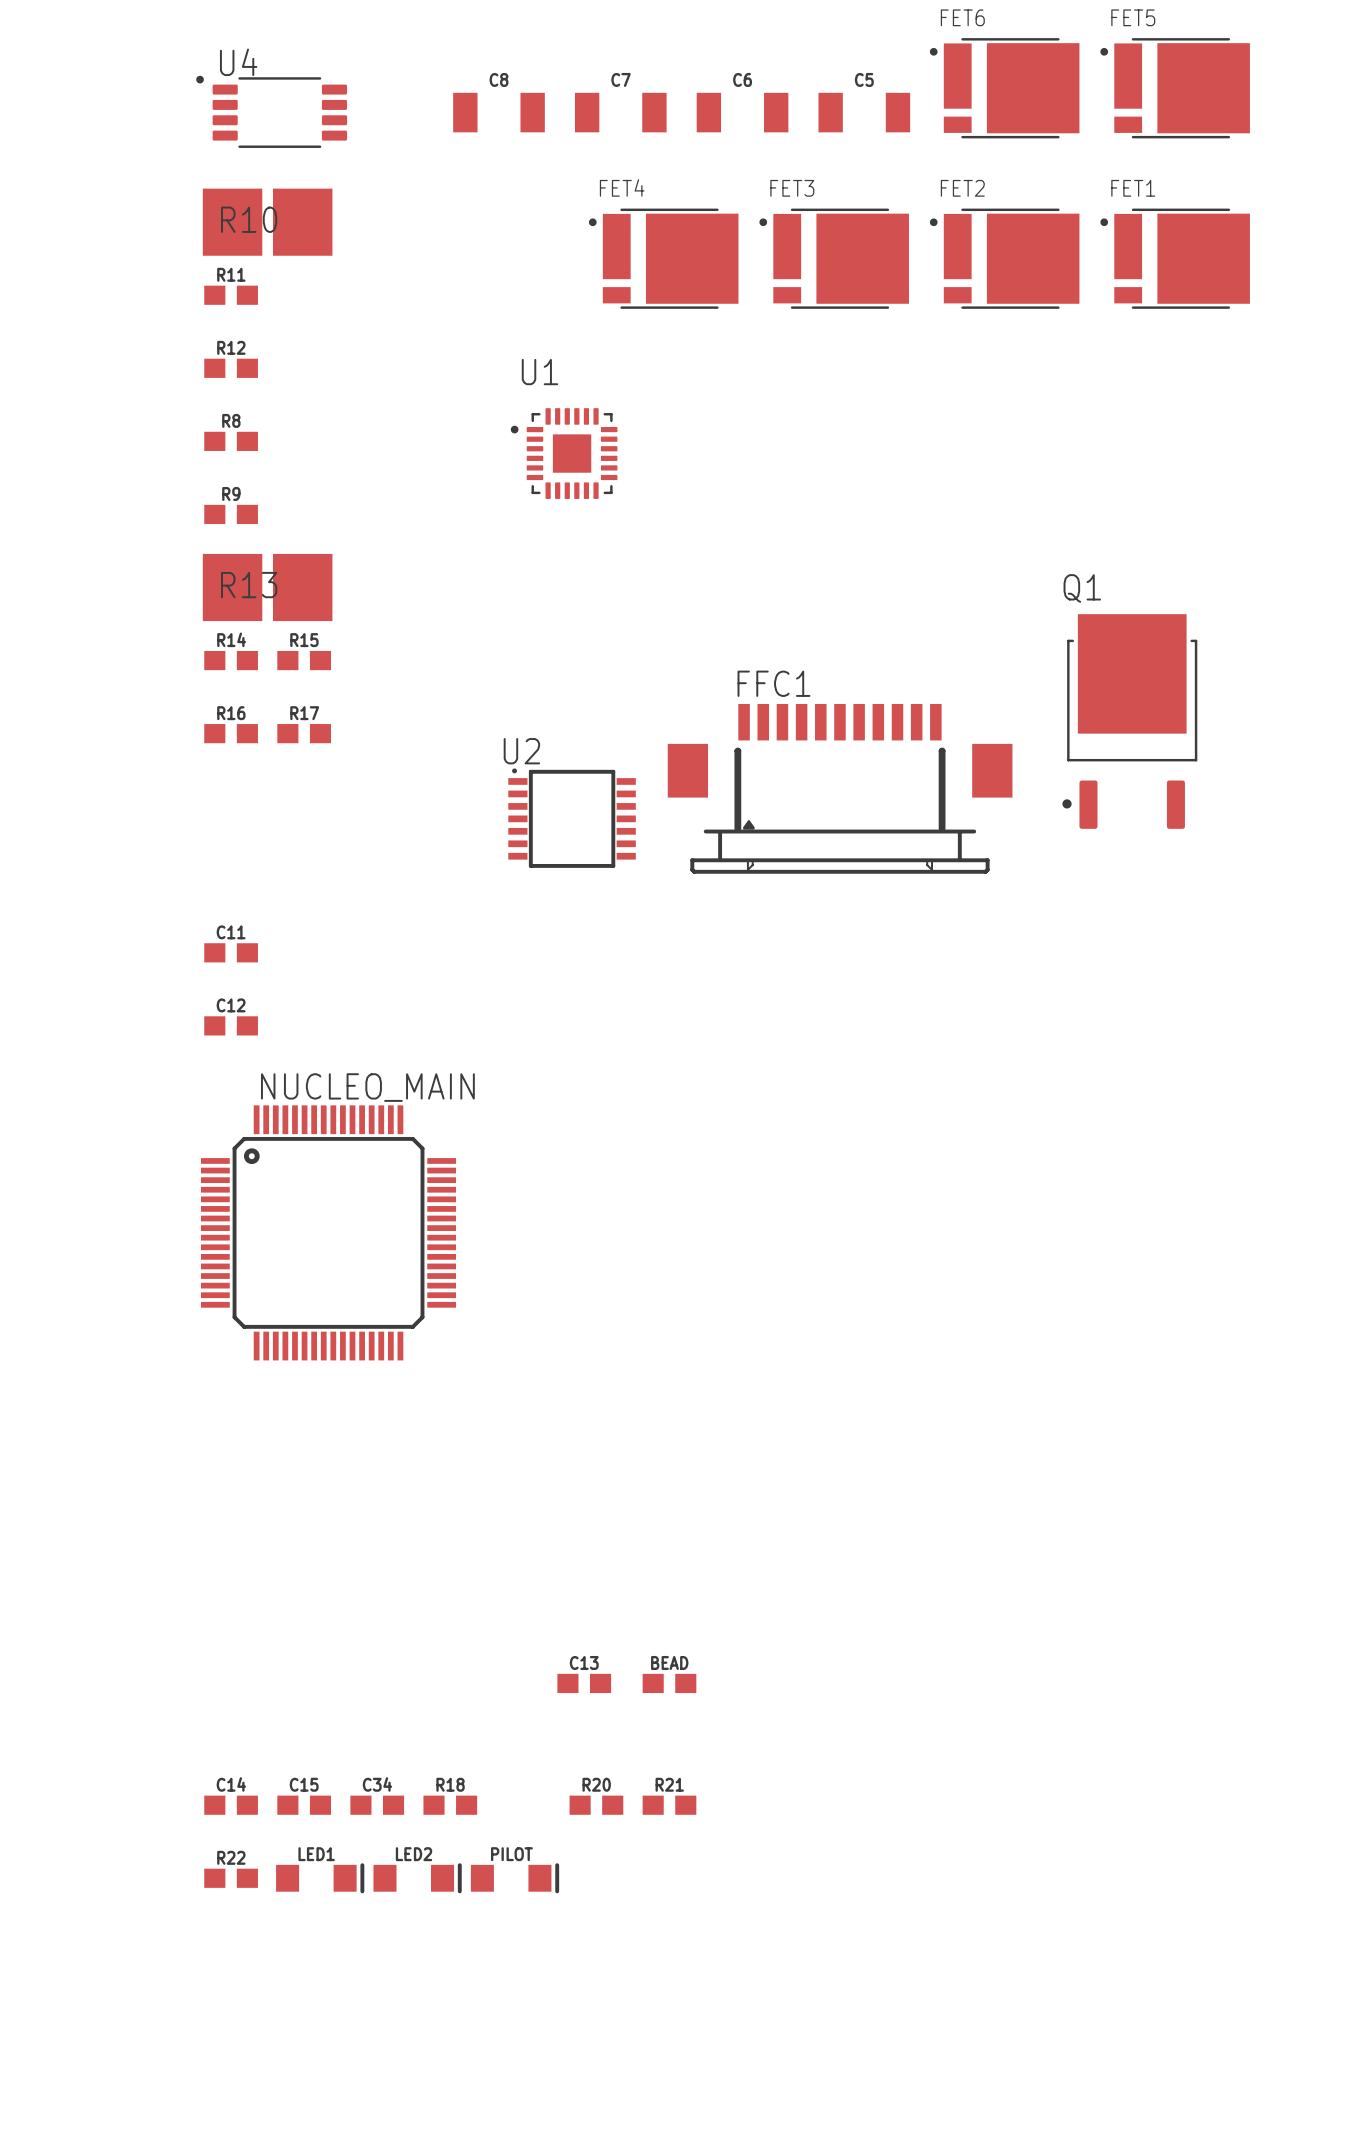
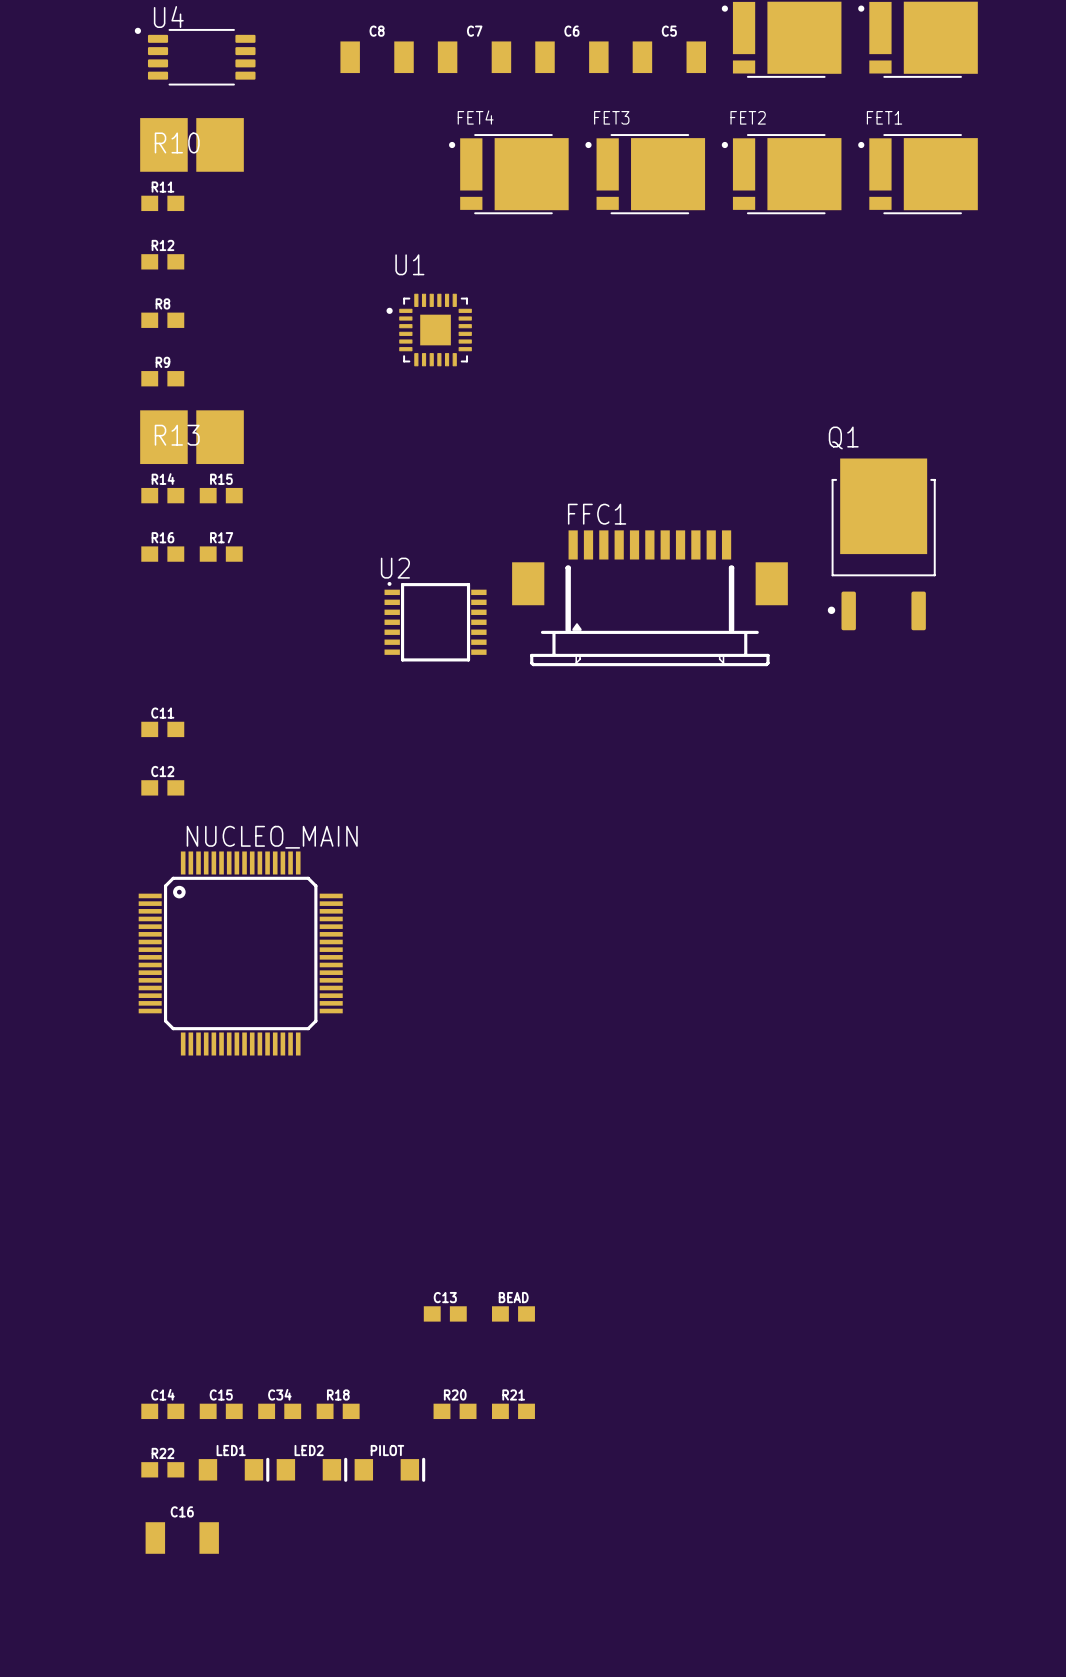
C16: none -> (182, 1537)

